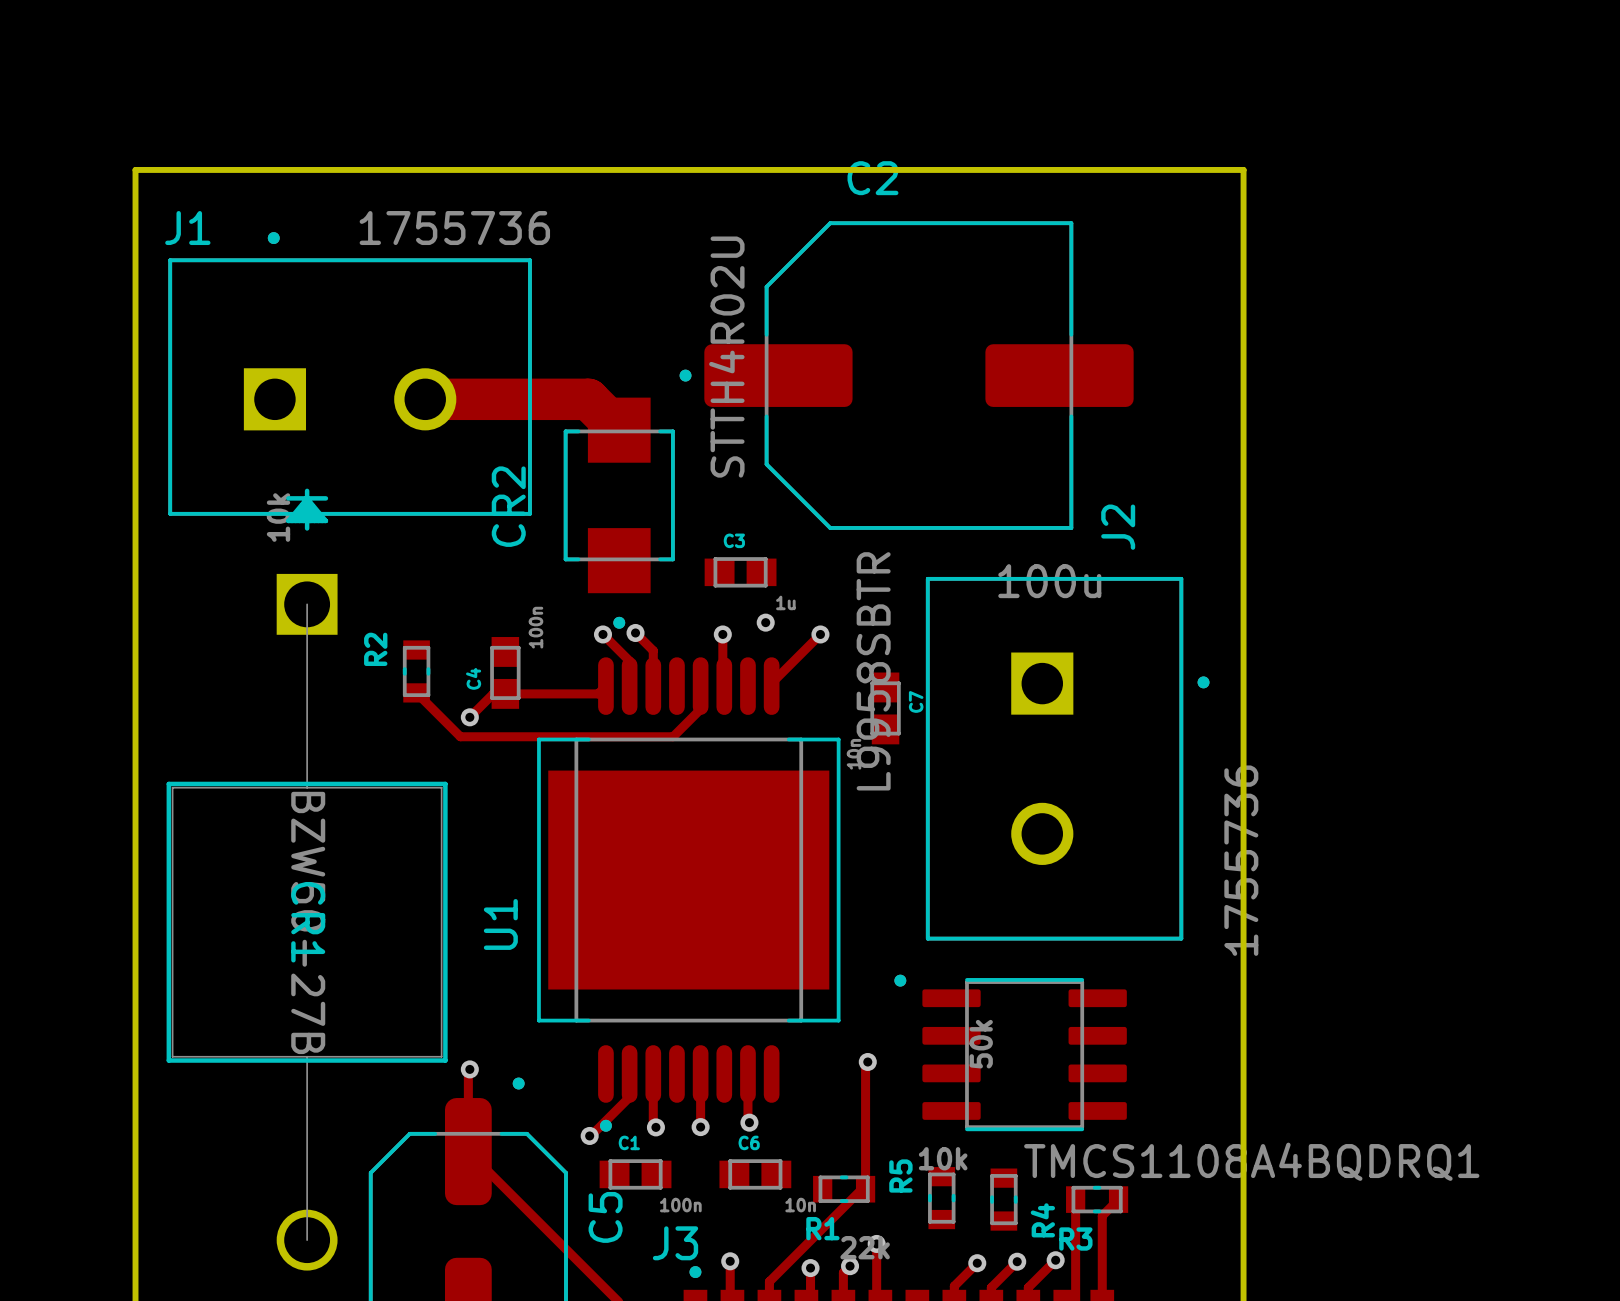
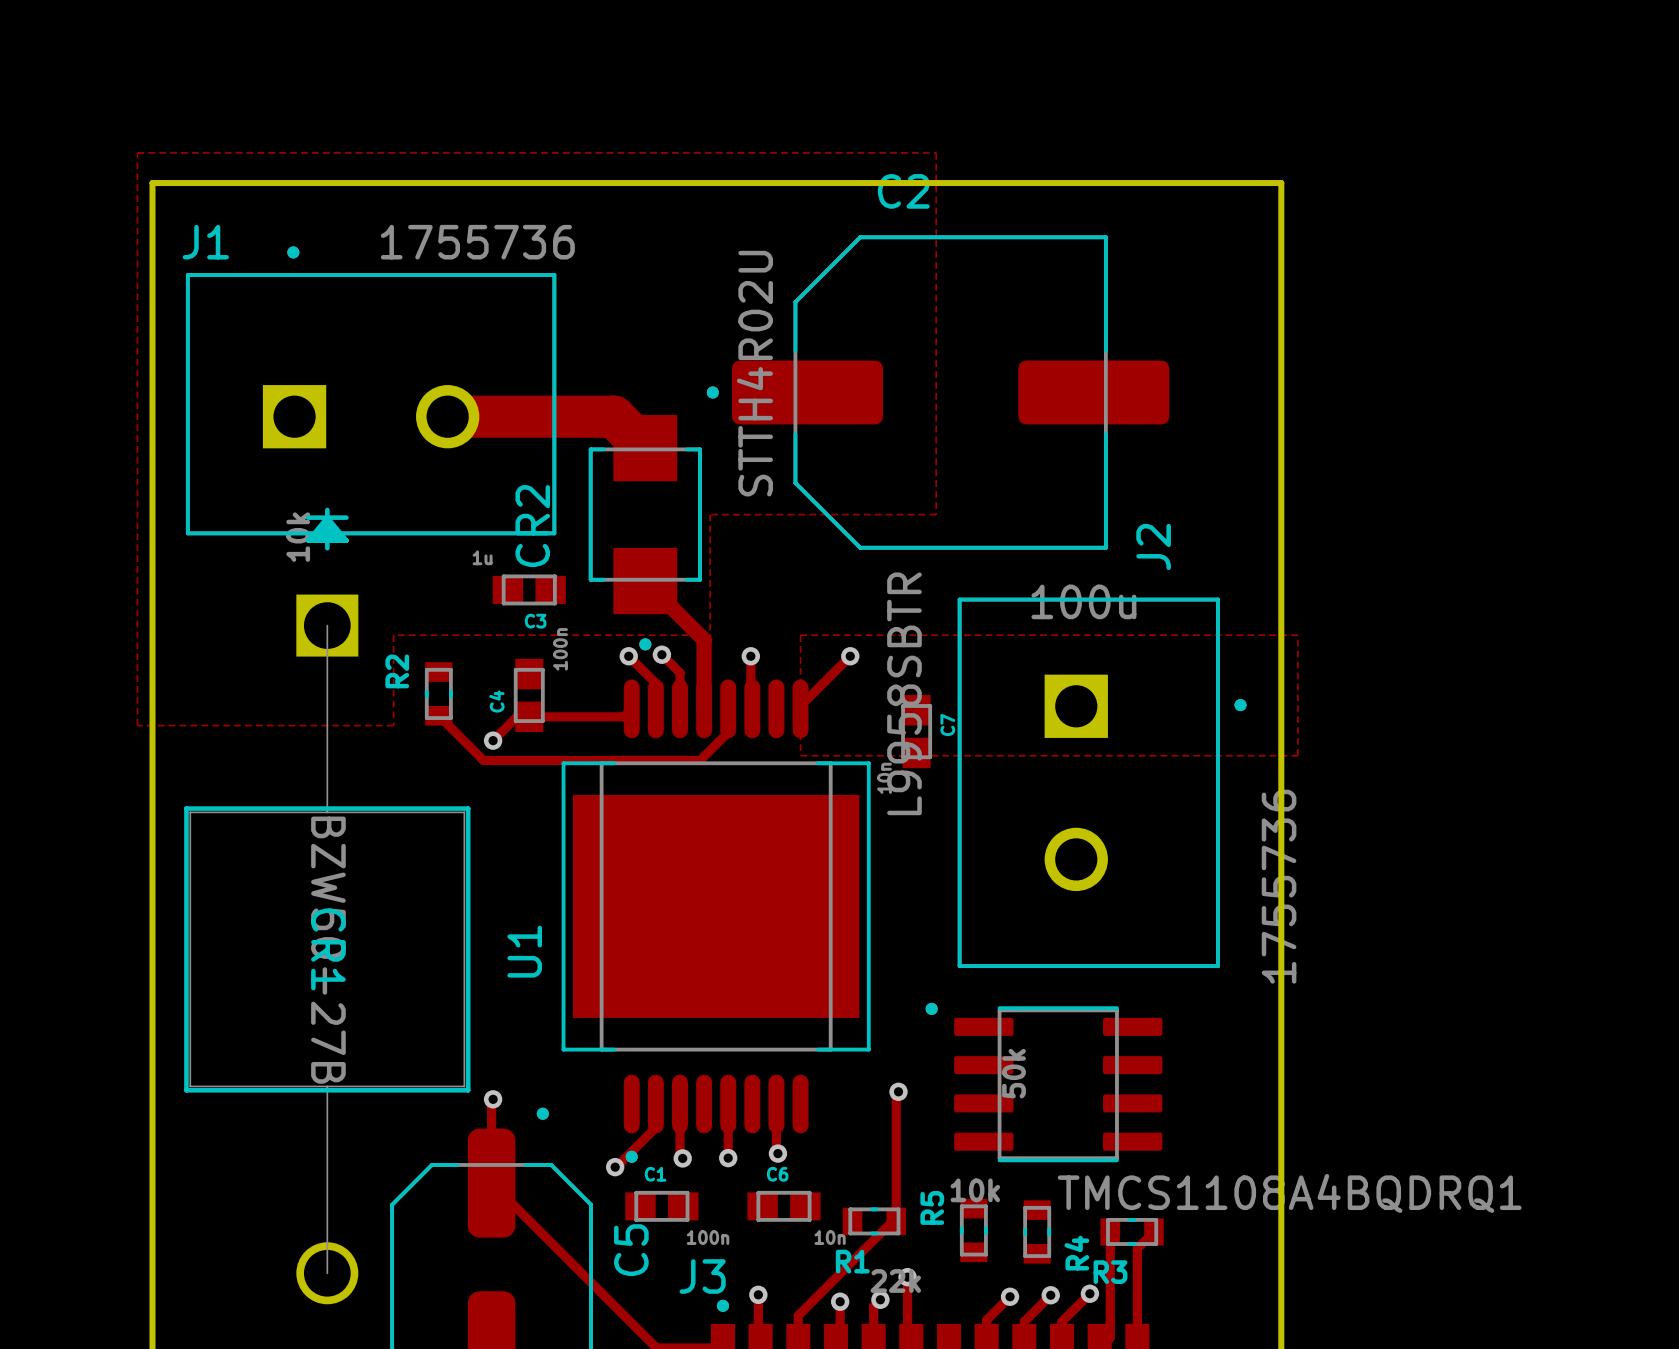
zone outline: none -> (137, 152) (936, 152) (936, 514) (710, 514) (710, 635) (393, 635) (393, 725) (137, 725) (137, 152)
C3 name position: C3 (734, 540) -> C3 (535, 621)
track: none -> (645, 581) (704, 639) (704, 708)
C3 position: (740, 572) -> (529, 589)
C3 value position: 1u (785, 602) -> 1u (482, 557)
zone outline: none -> (800, 635) (1297, 635) (1297, 755) (800, 755) (800, 635)
via: (765, 622) -> none

